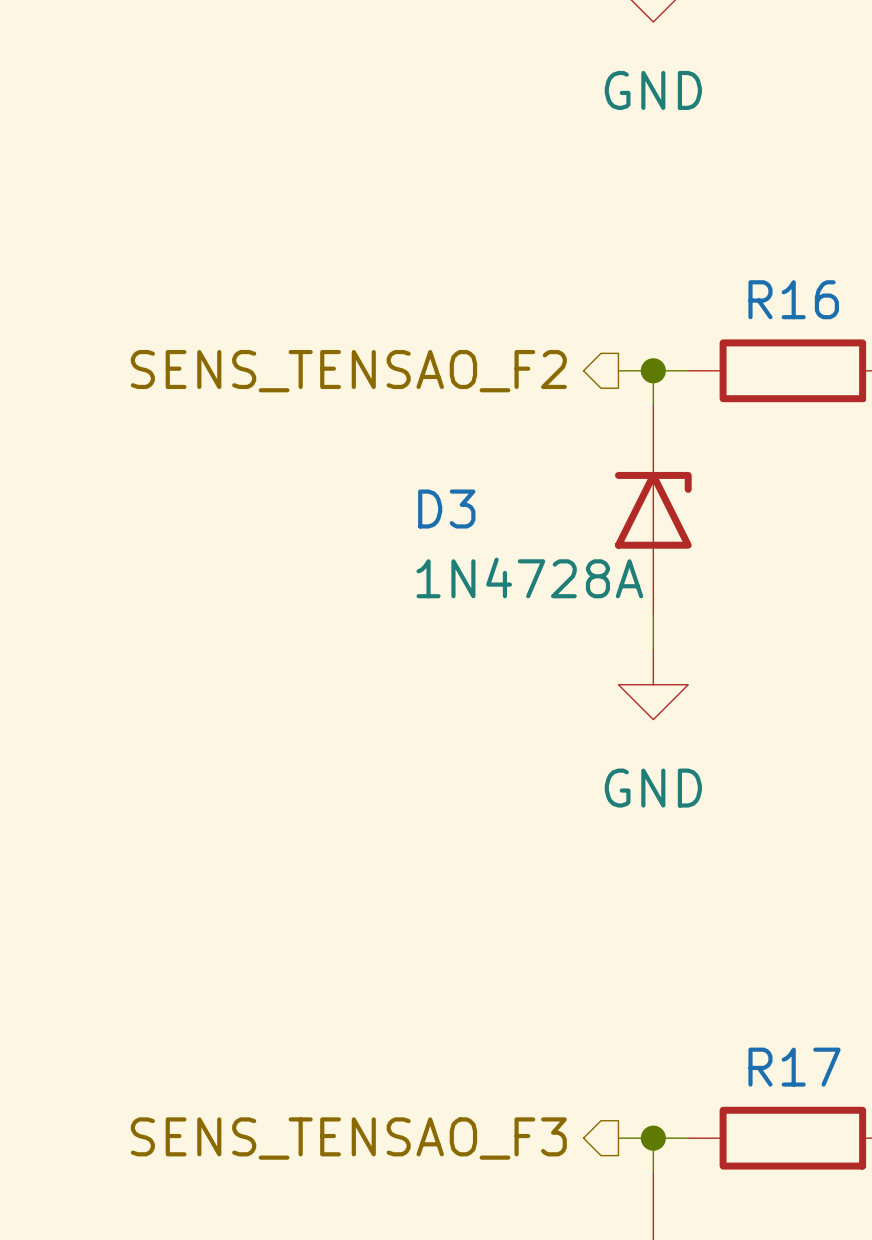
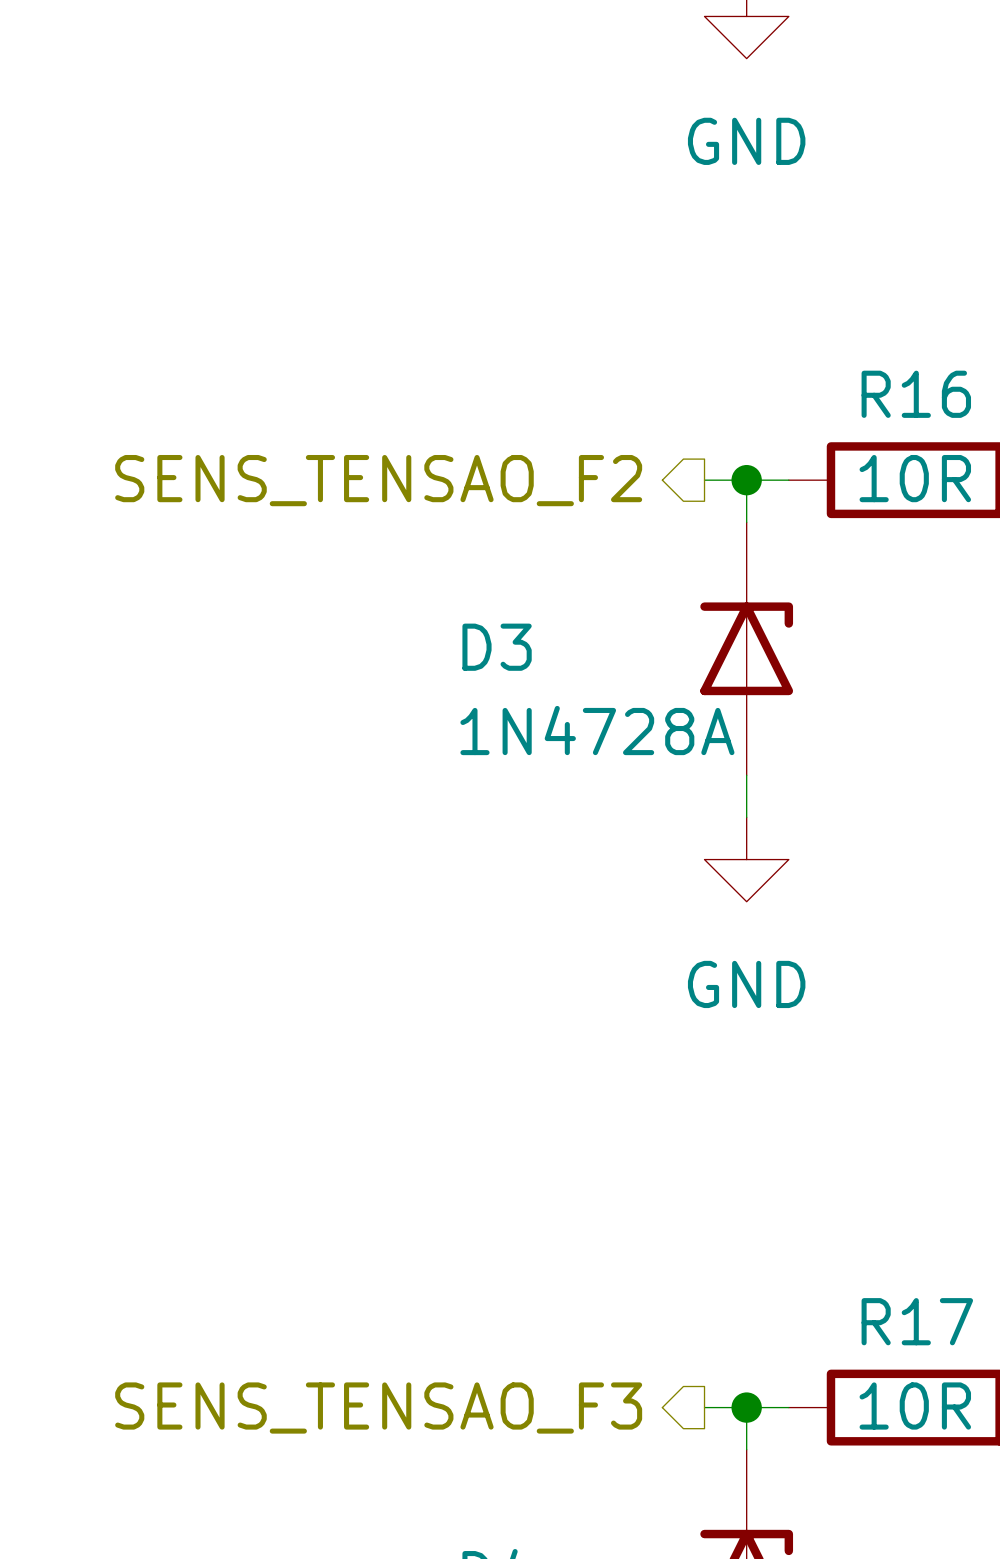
R16 value: none -> 10R (915, 478)
R17 value: none -> 10R (915, 1406)

